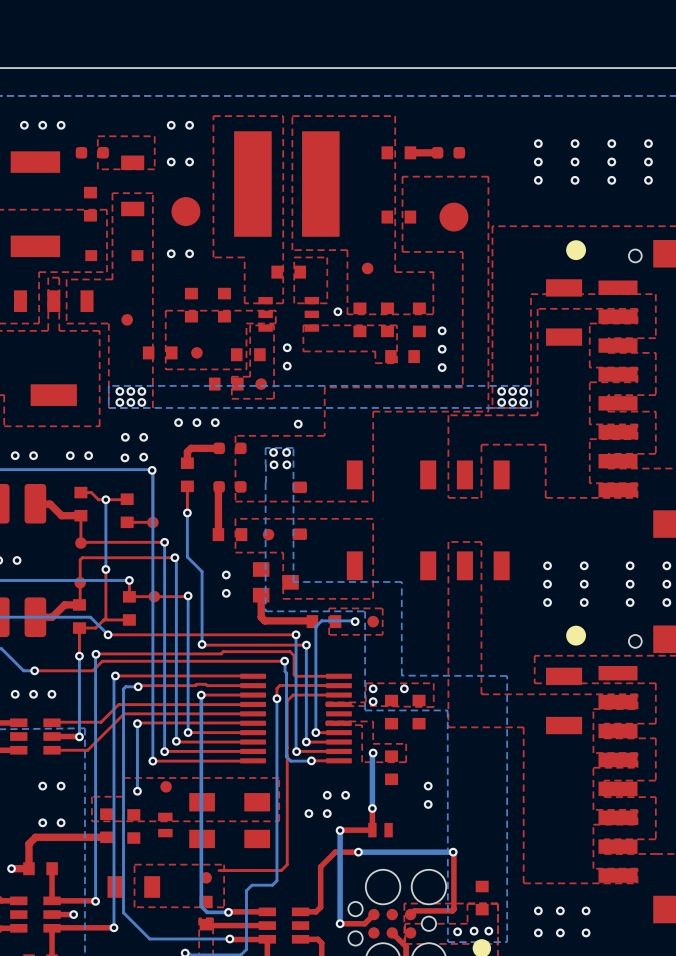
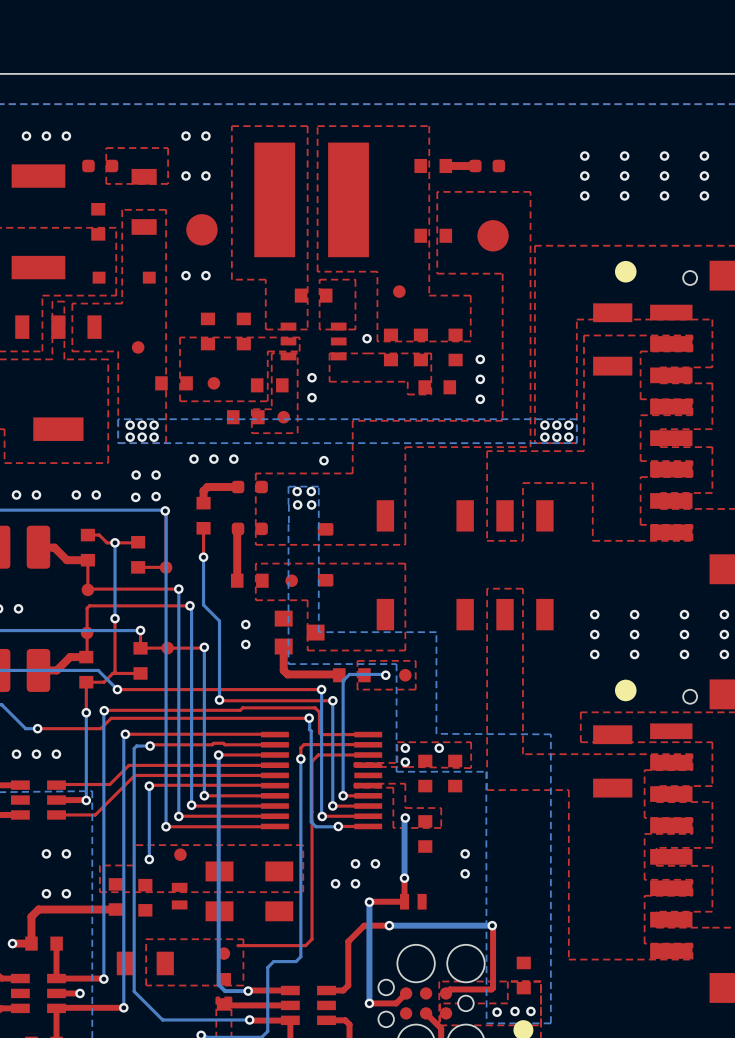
via: (538, 910) -> none
via: (560, 910) -> none
via: (586, 910) -> none
via: (538, 932) -> none
via: (560, 932) -> none
via: (586, 932) -> none

